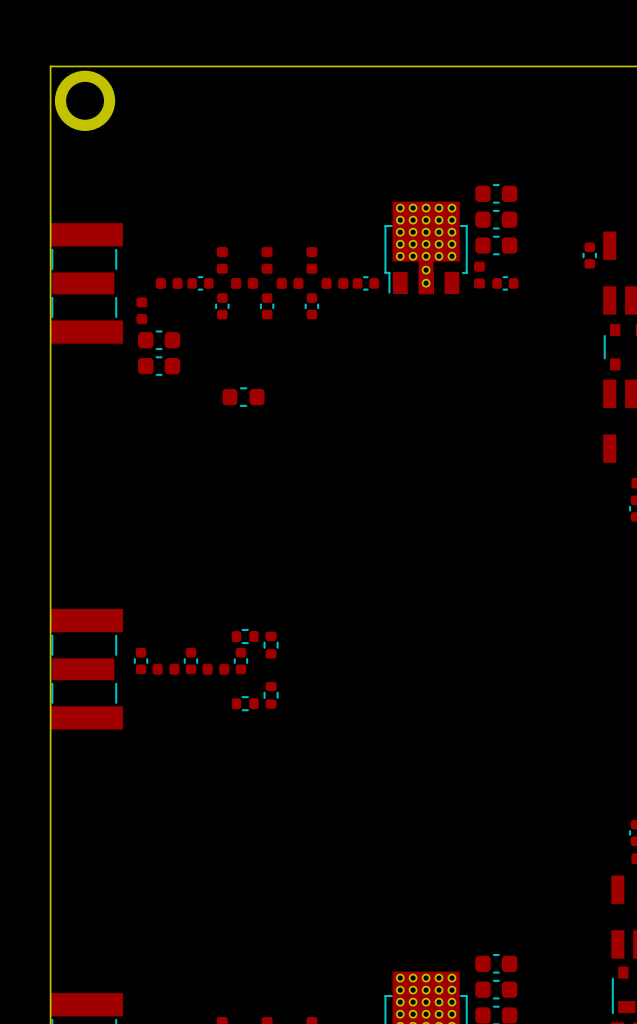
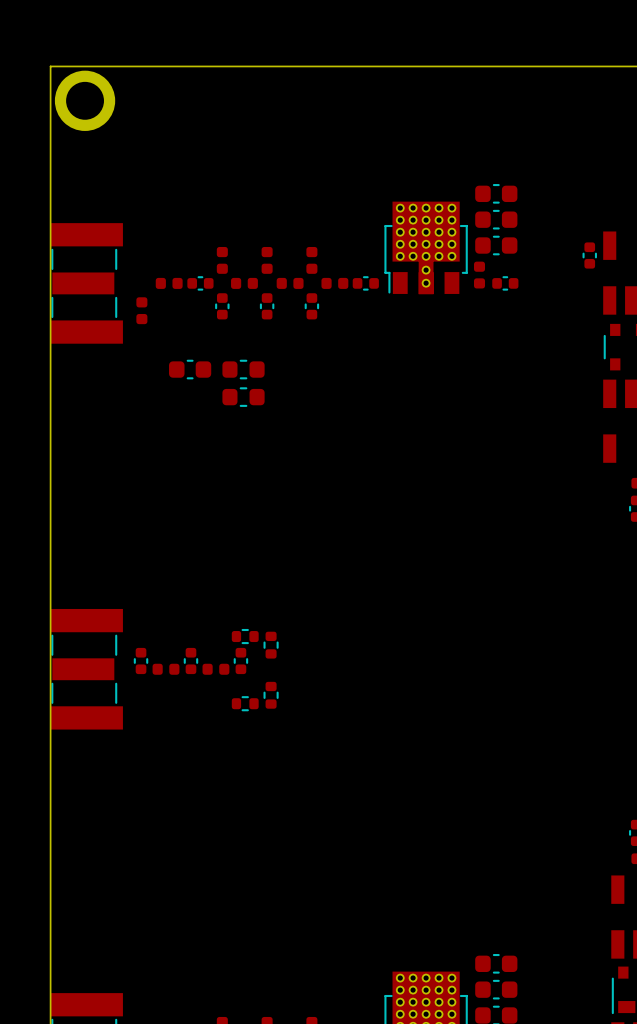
part: (159, 340) -> none
part: (159, 366) -> none
part: none -> (190, 369)
part: none -> (243, 369)

